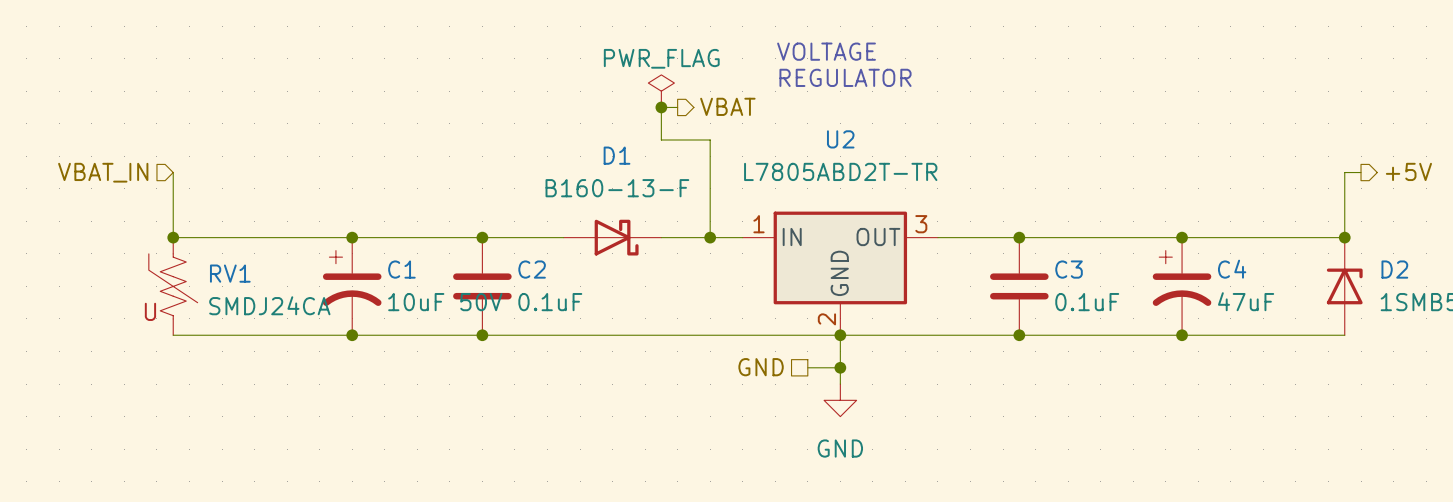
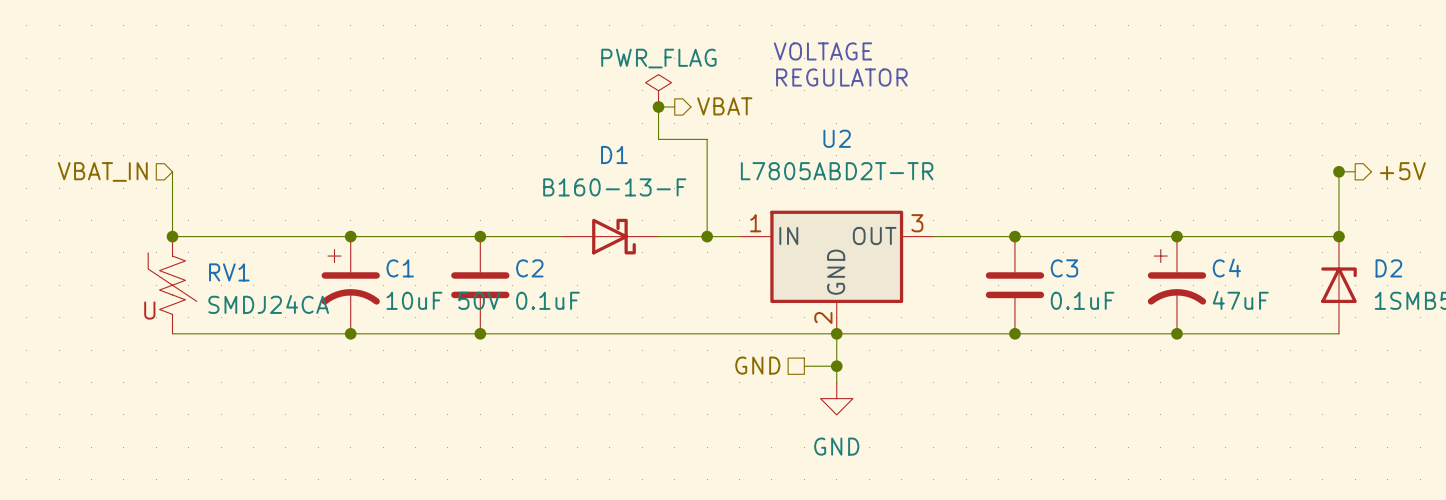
junction: none -> (1338, 171)

